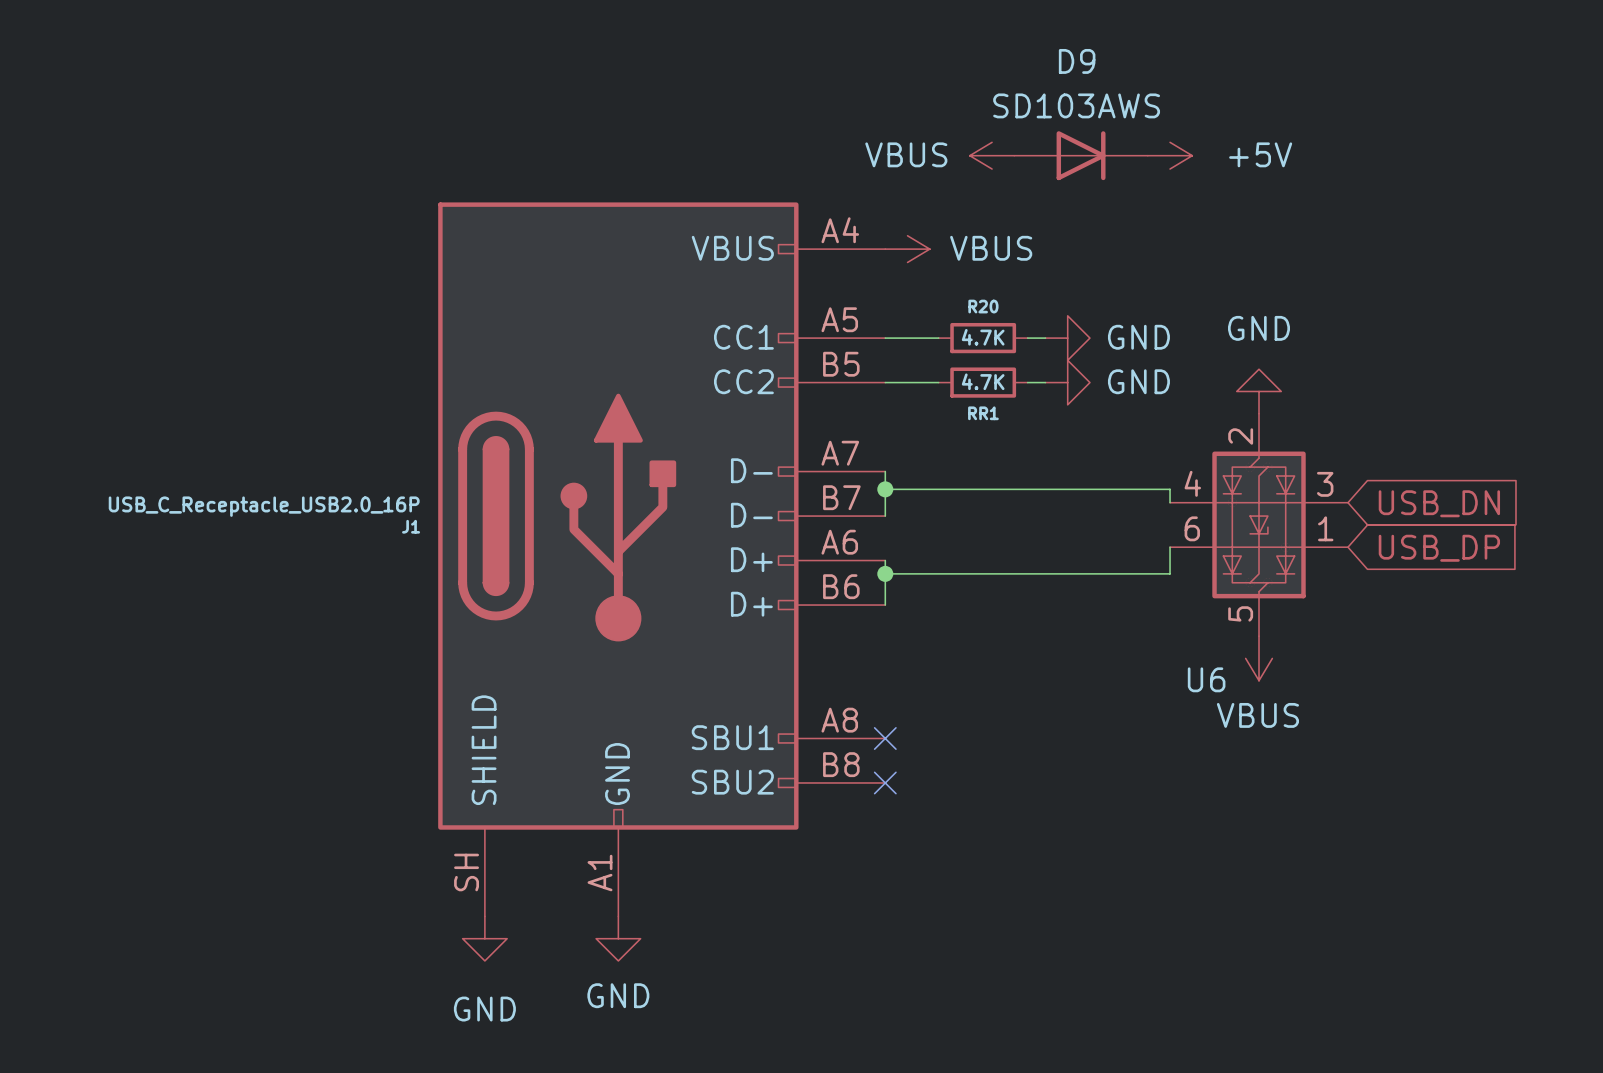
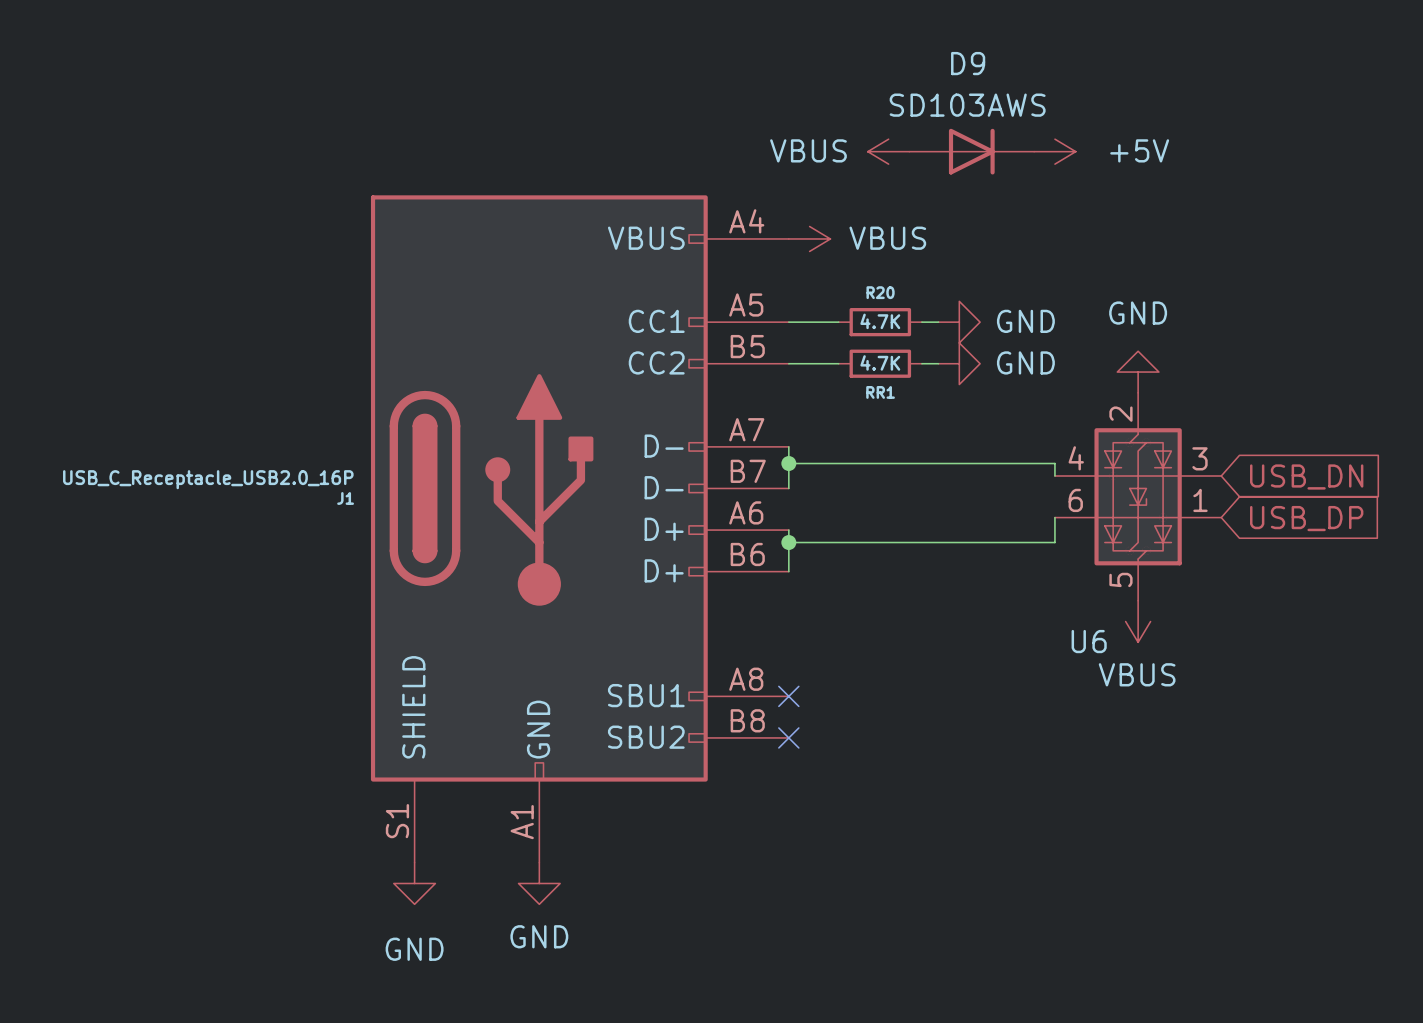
J1 pin number: SH (466, 872) -> S1 (397, 821)

